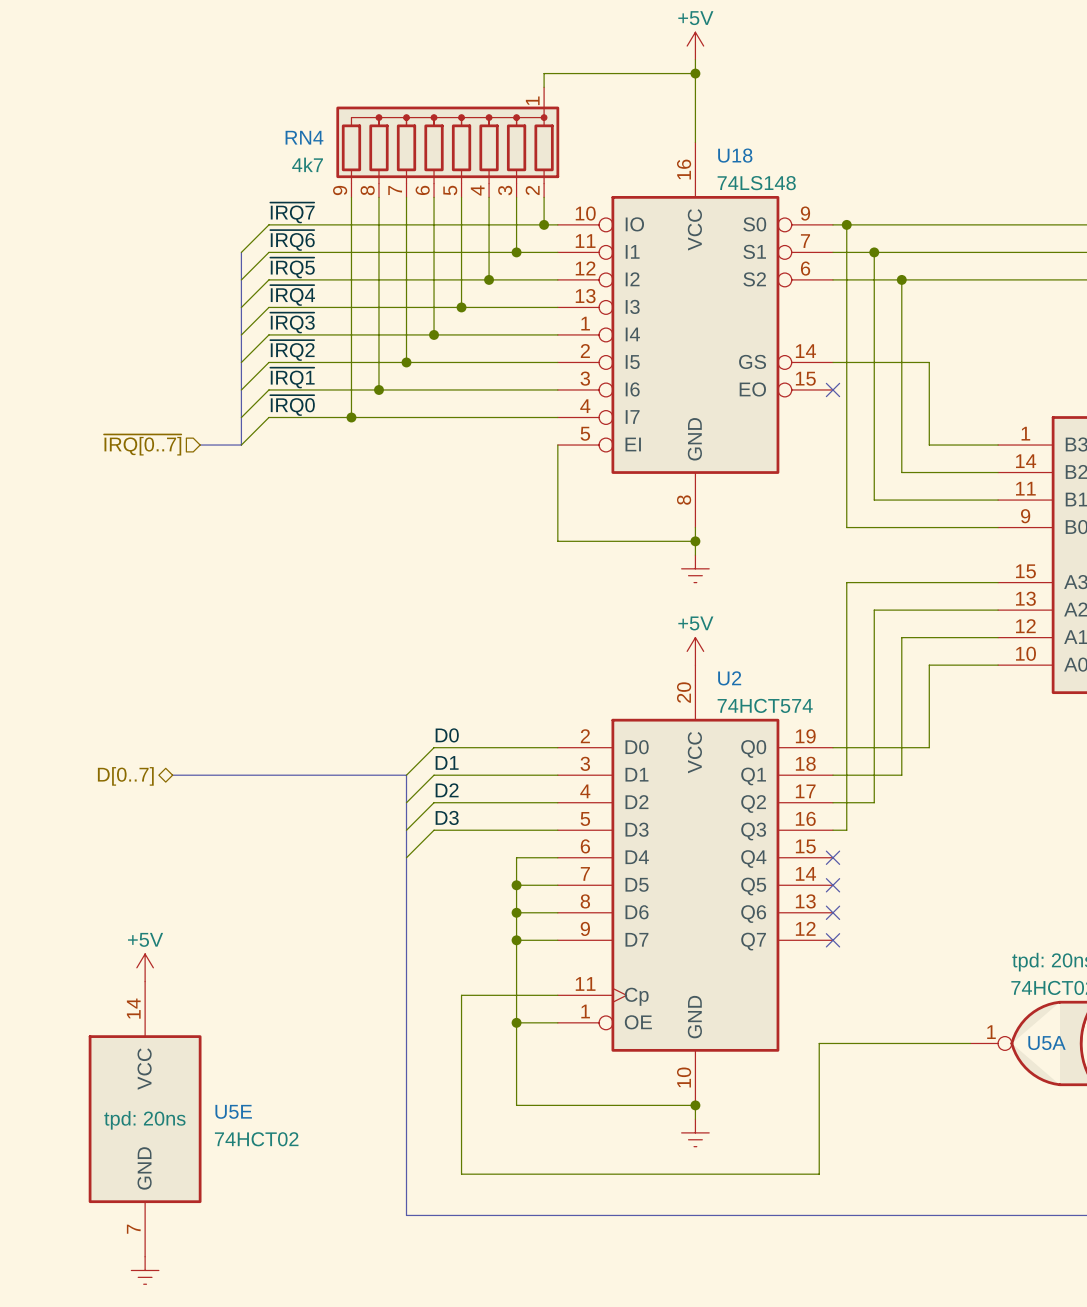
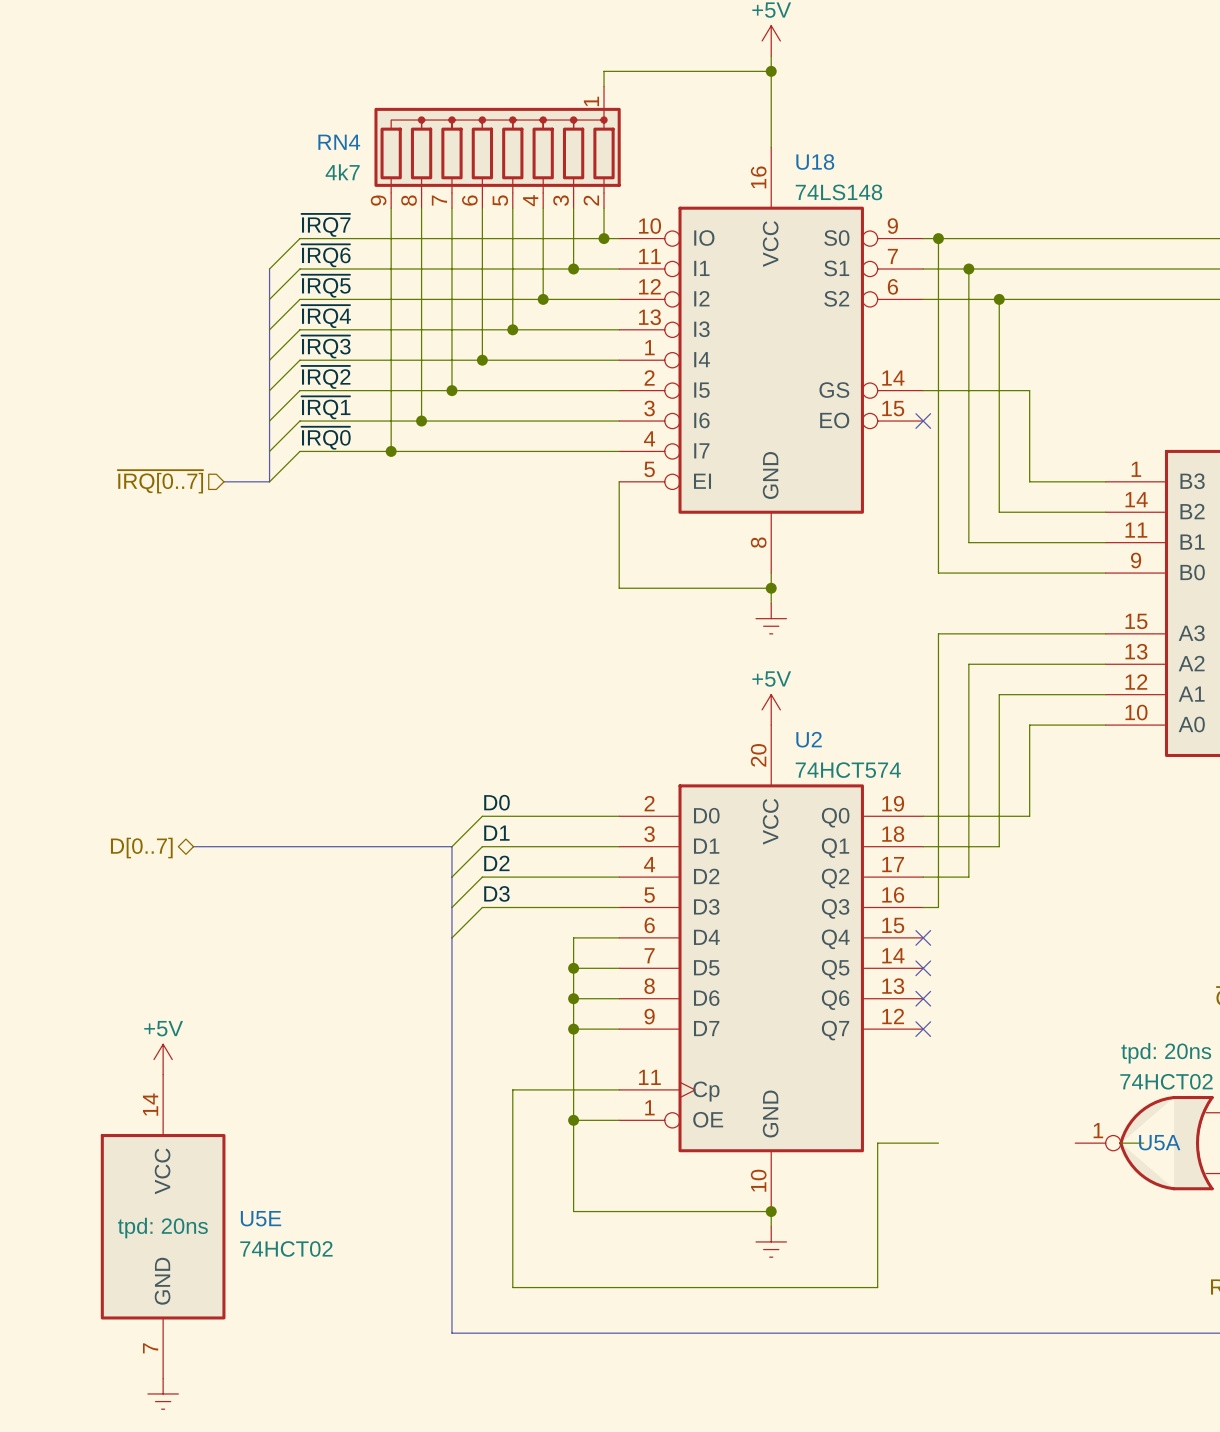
wire: (819, 1043) (819, 1174) (791, 1174) -> (908, 1143) (877, 1143) (877, 1287)
wire: (846, 1043) (970, 1043) -> none
wire: none -> (1120, 1143) (1143, 1143)

